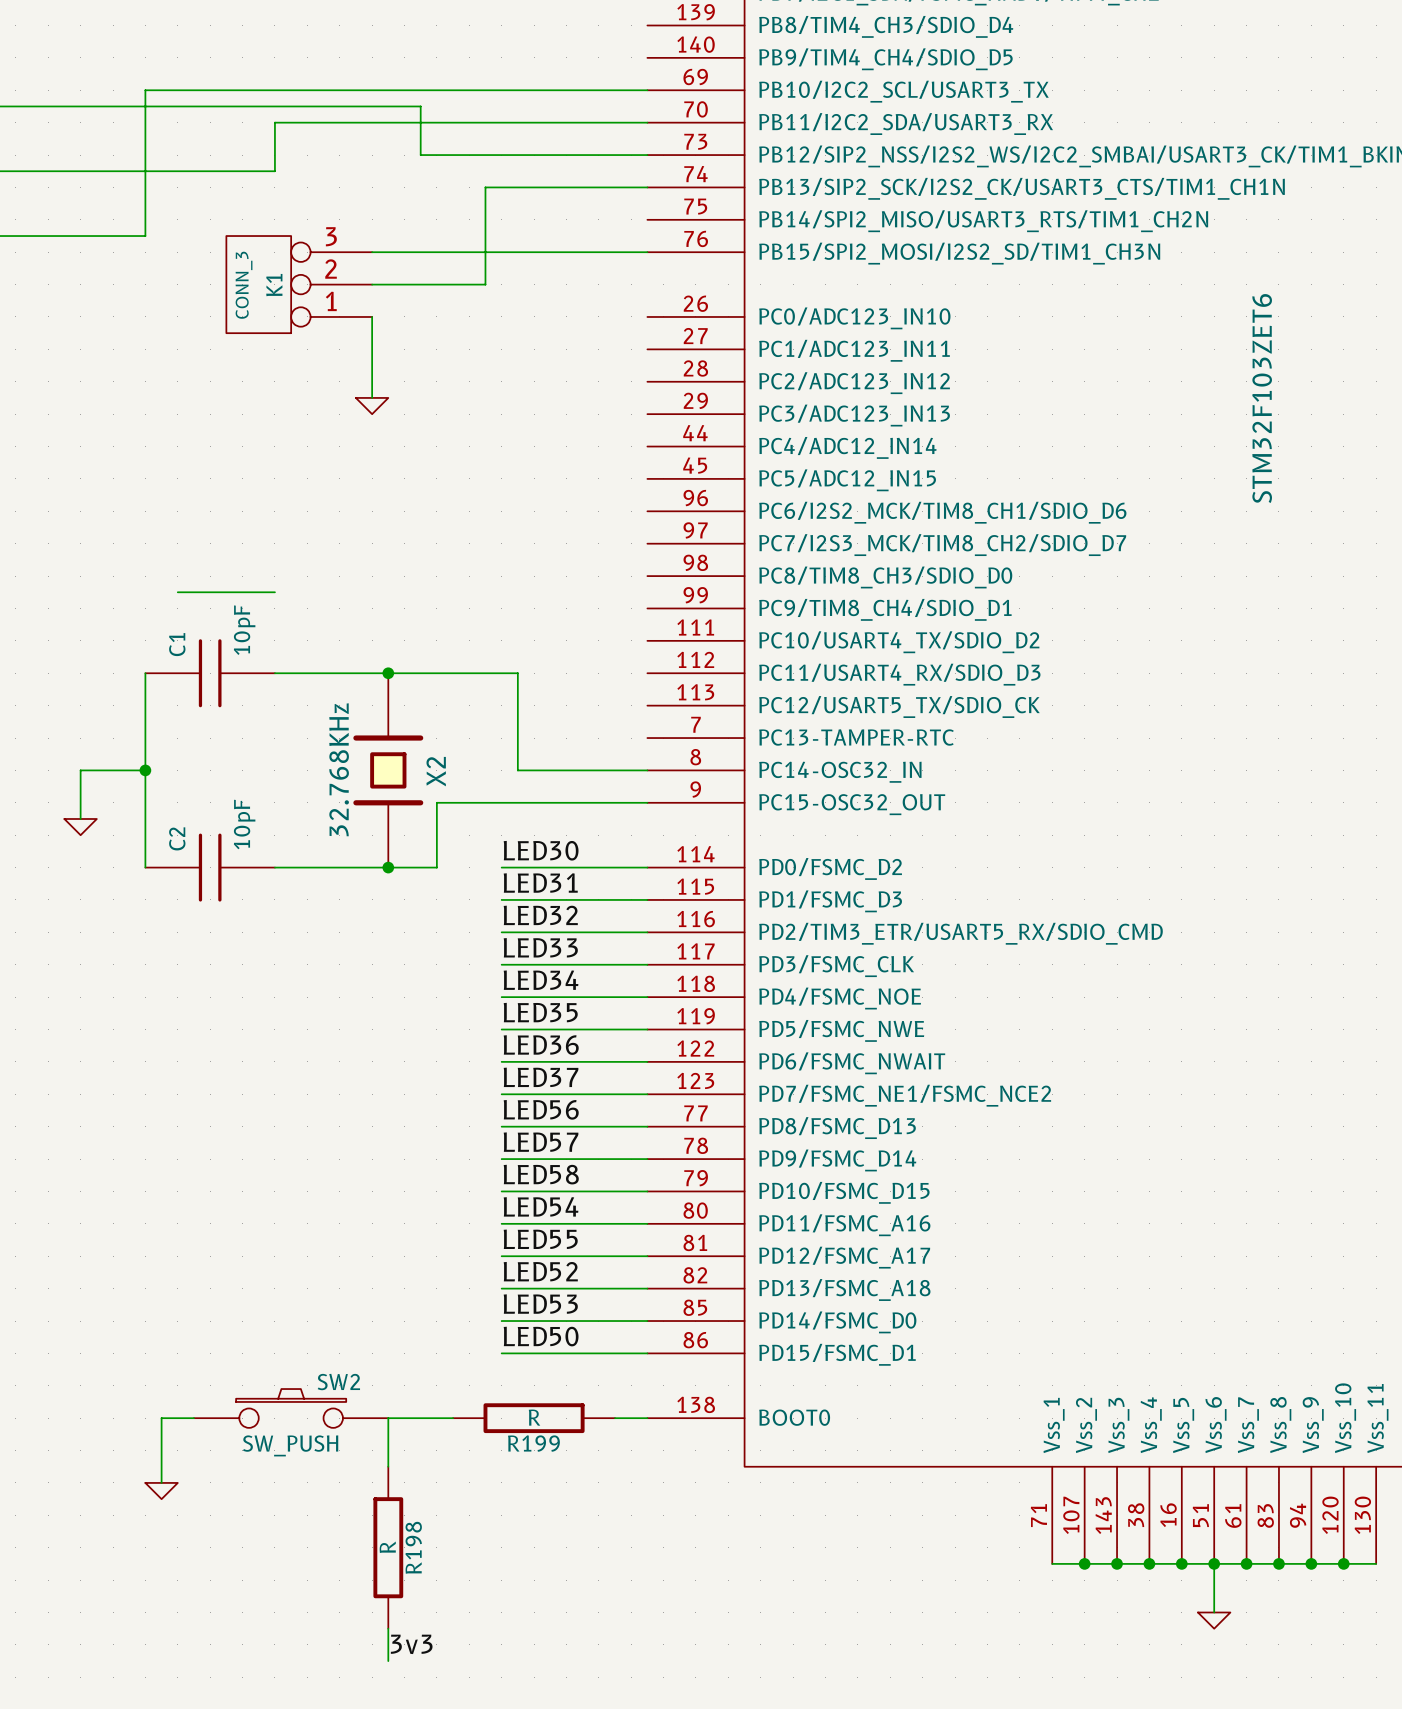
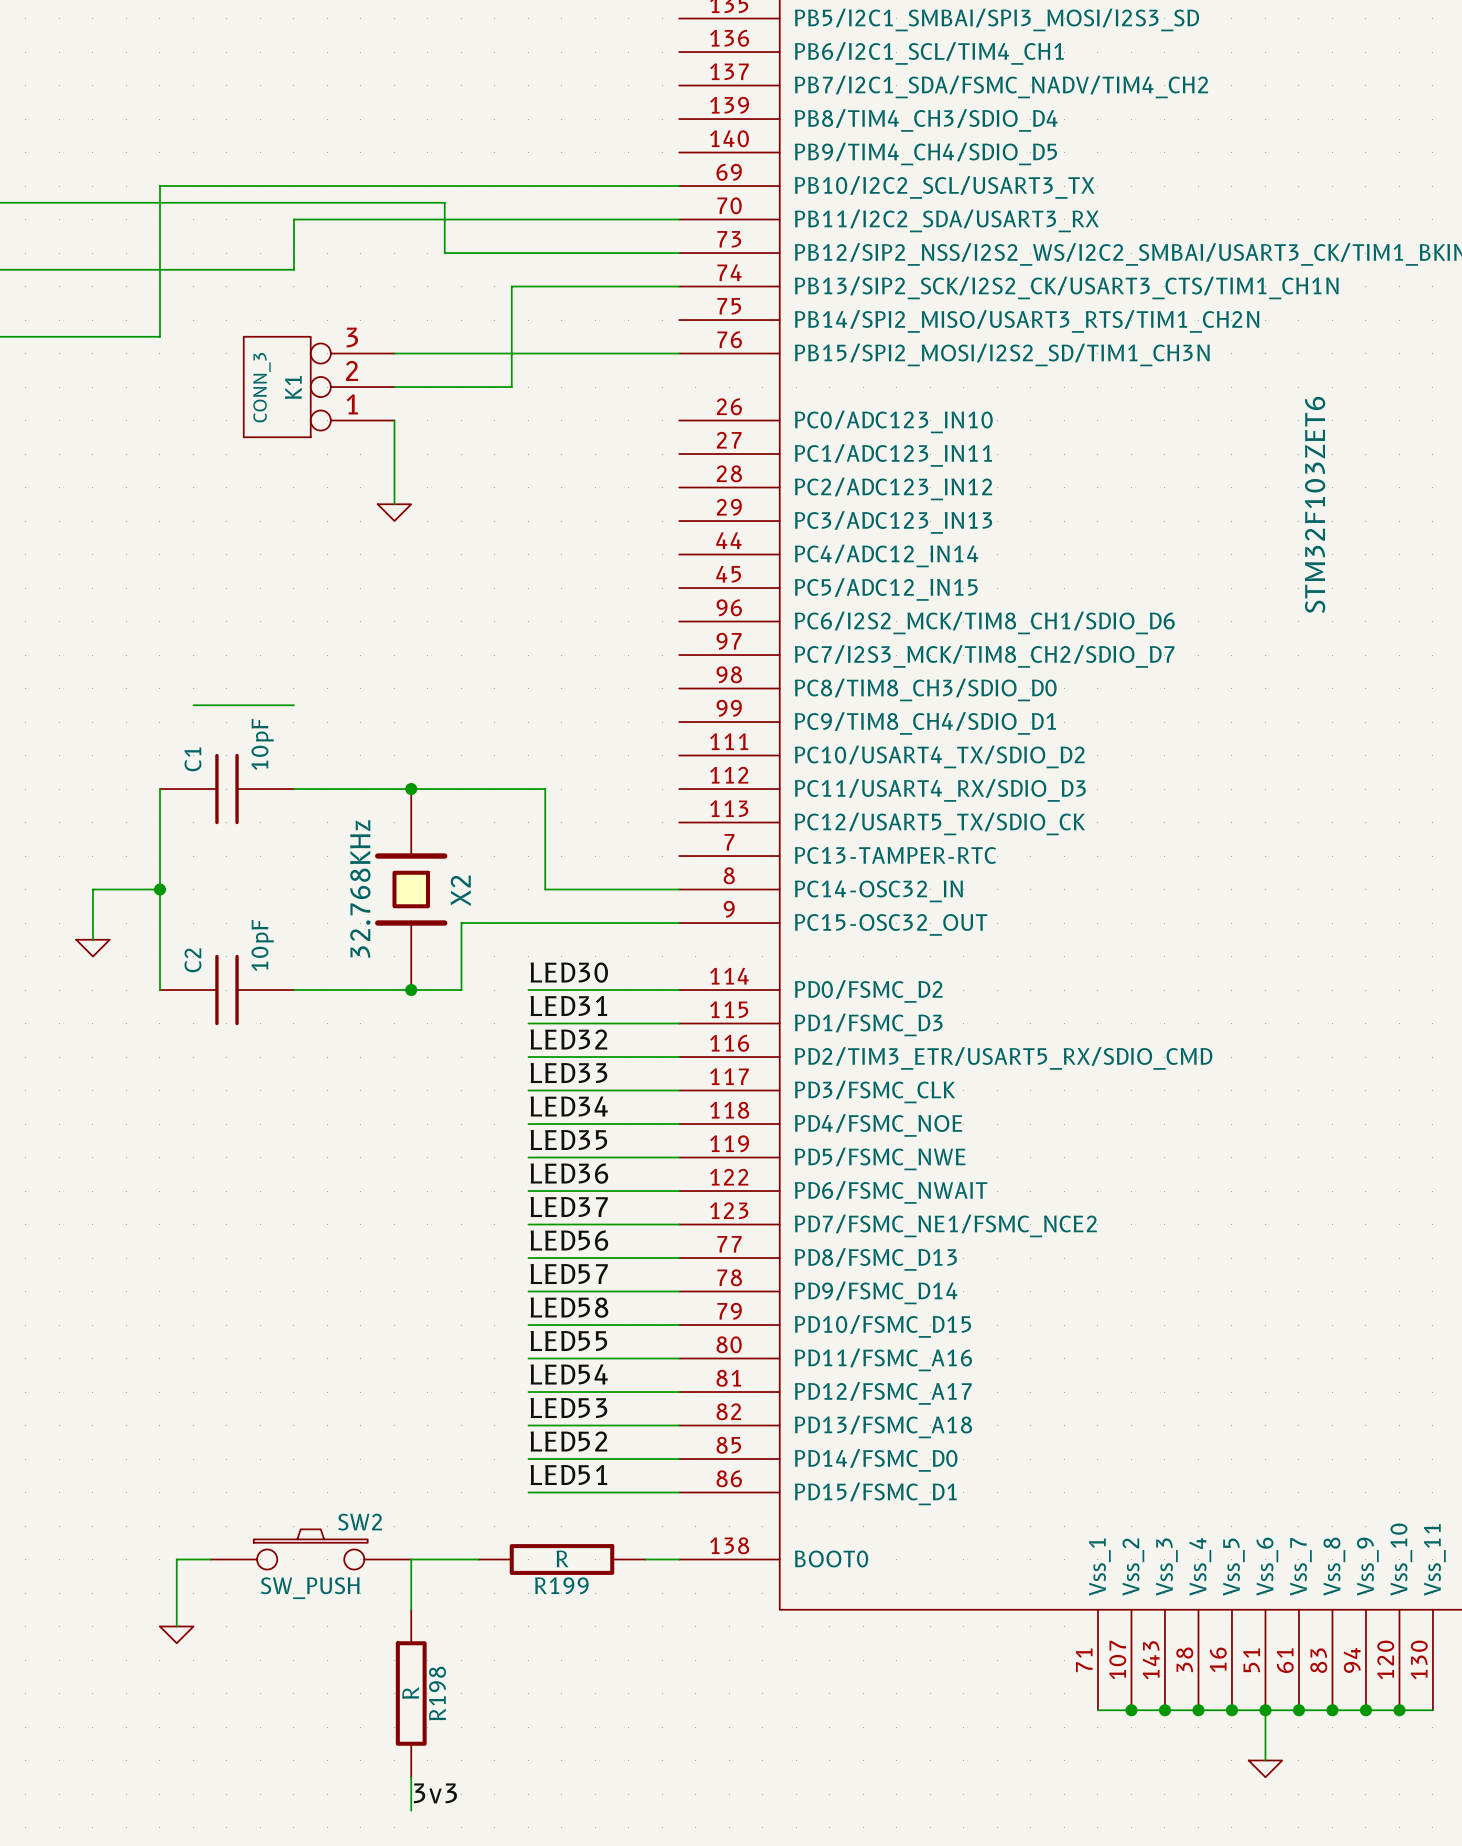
label: LED54 (541, 1206) -> LED55 (568, 1340)
label: LED55 (540, 1239) -> LED54 (569, 1374)
label: LED52 (540, 1271) -> LED53 (568, 1407)
label: LED53 (540, 1304) -> LED52 (568, 1441)
label: LED50 (541, 1336) -> LED51 (568, 1474)

